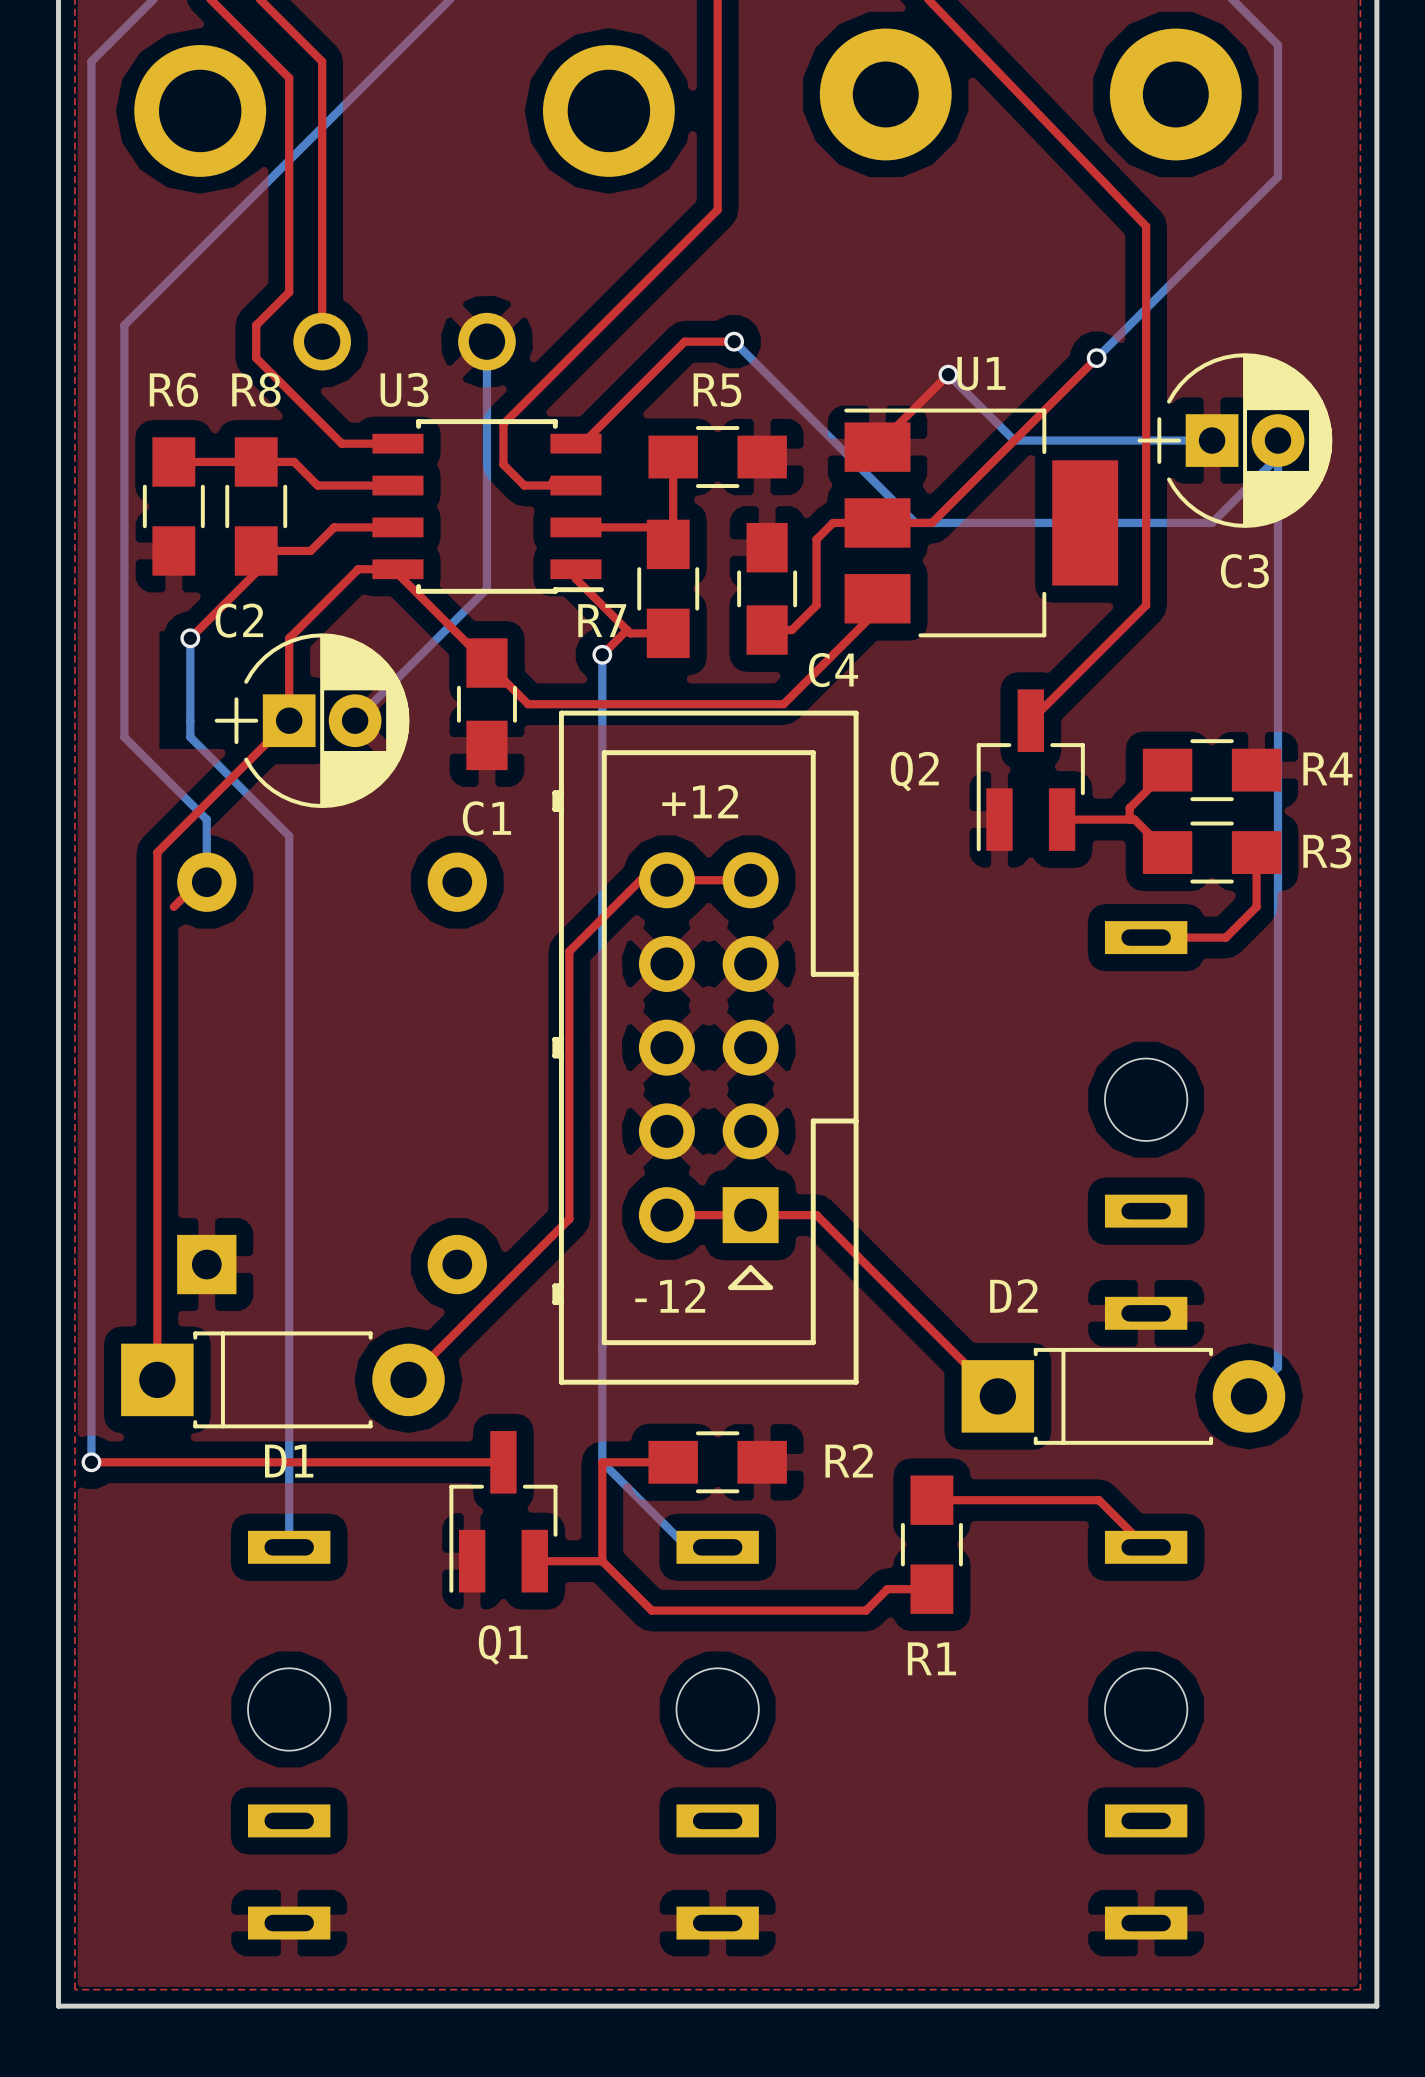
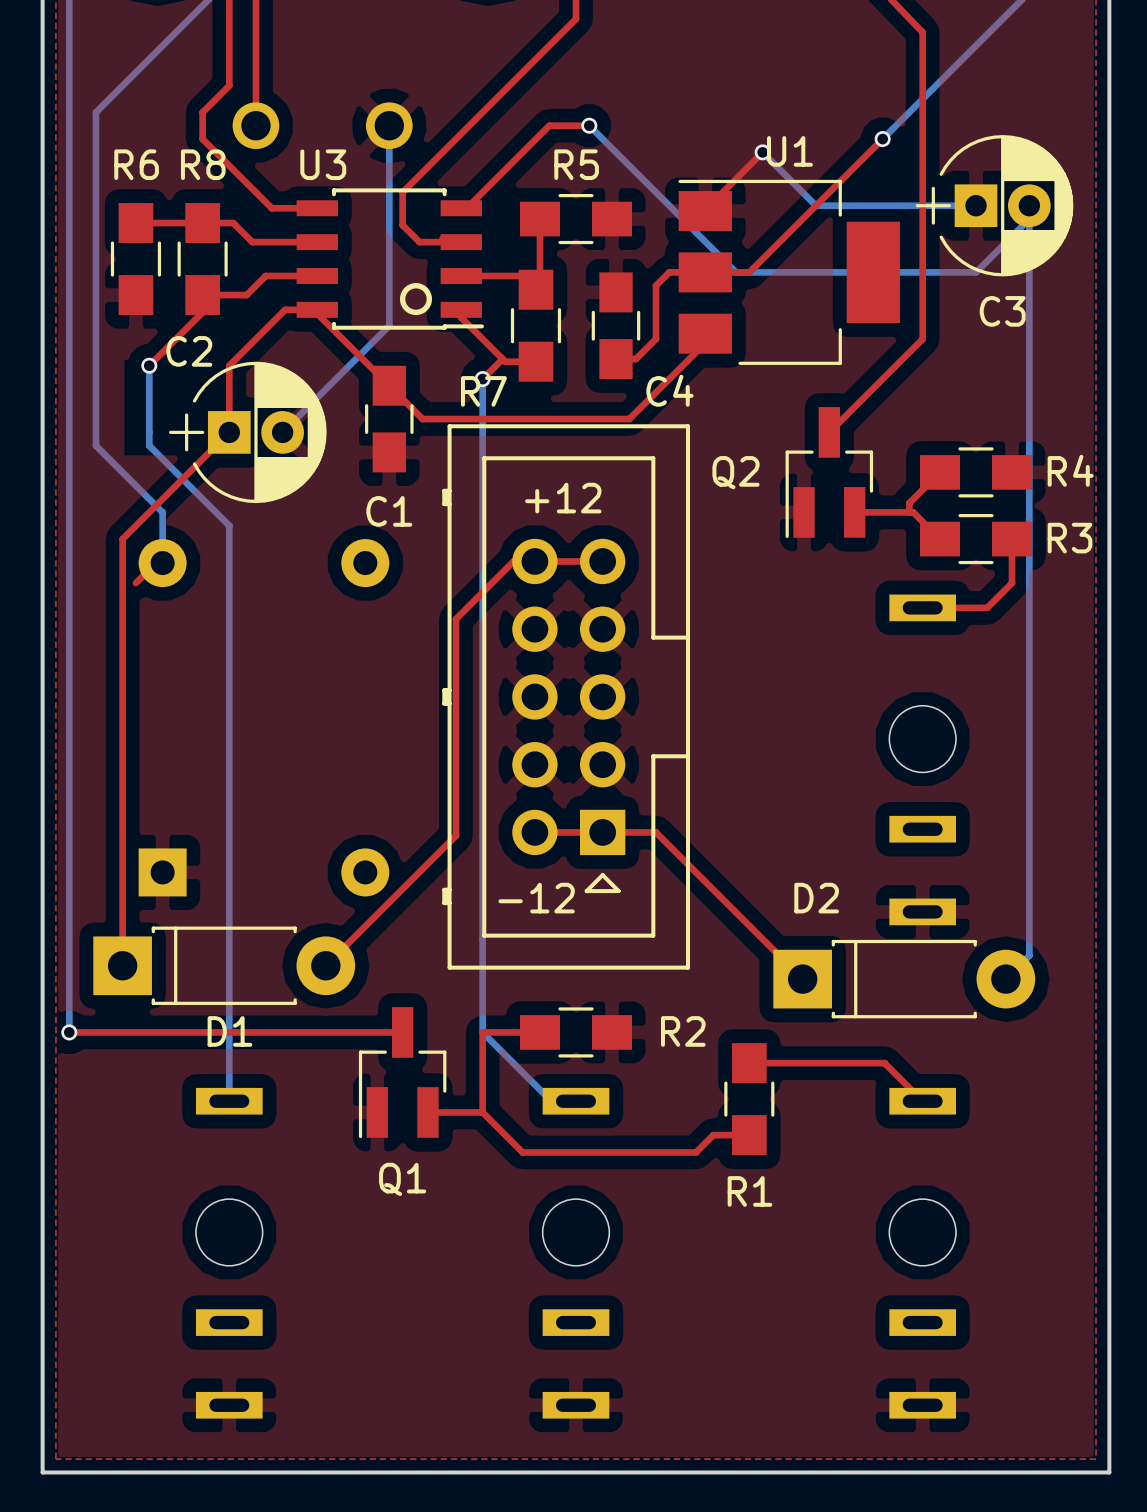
drawing: none -> [399, 283, 432, 316]
R7 name position: R7 (602, 620) -> R7 (483, 391)

